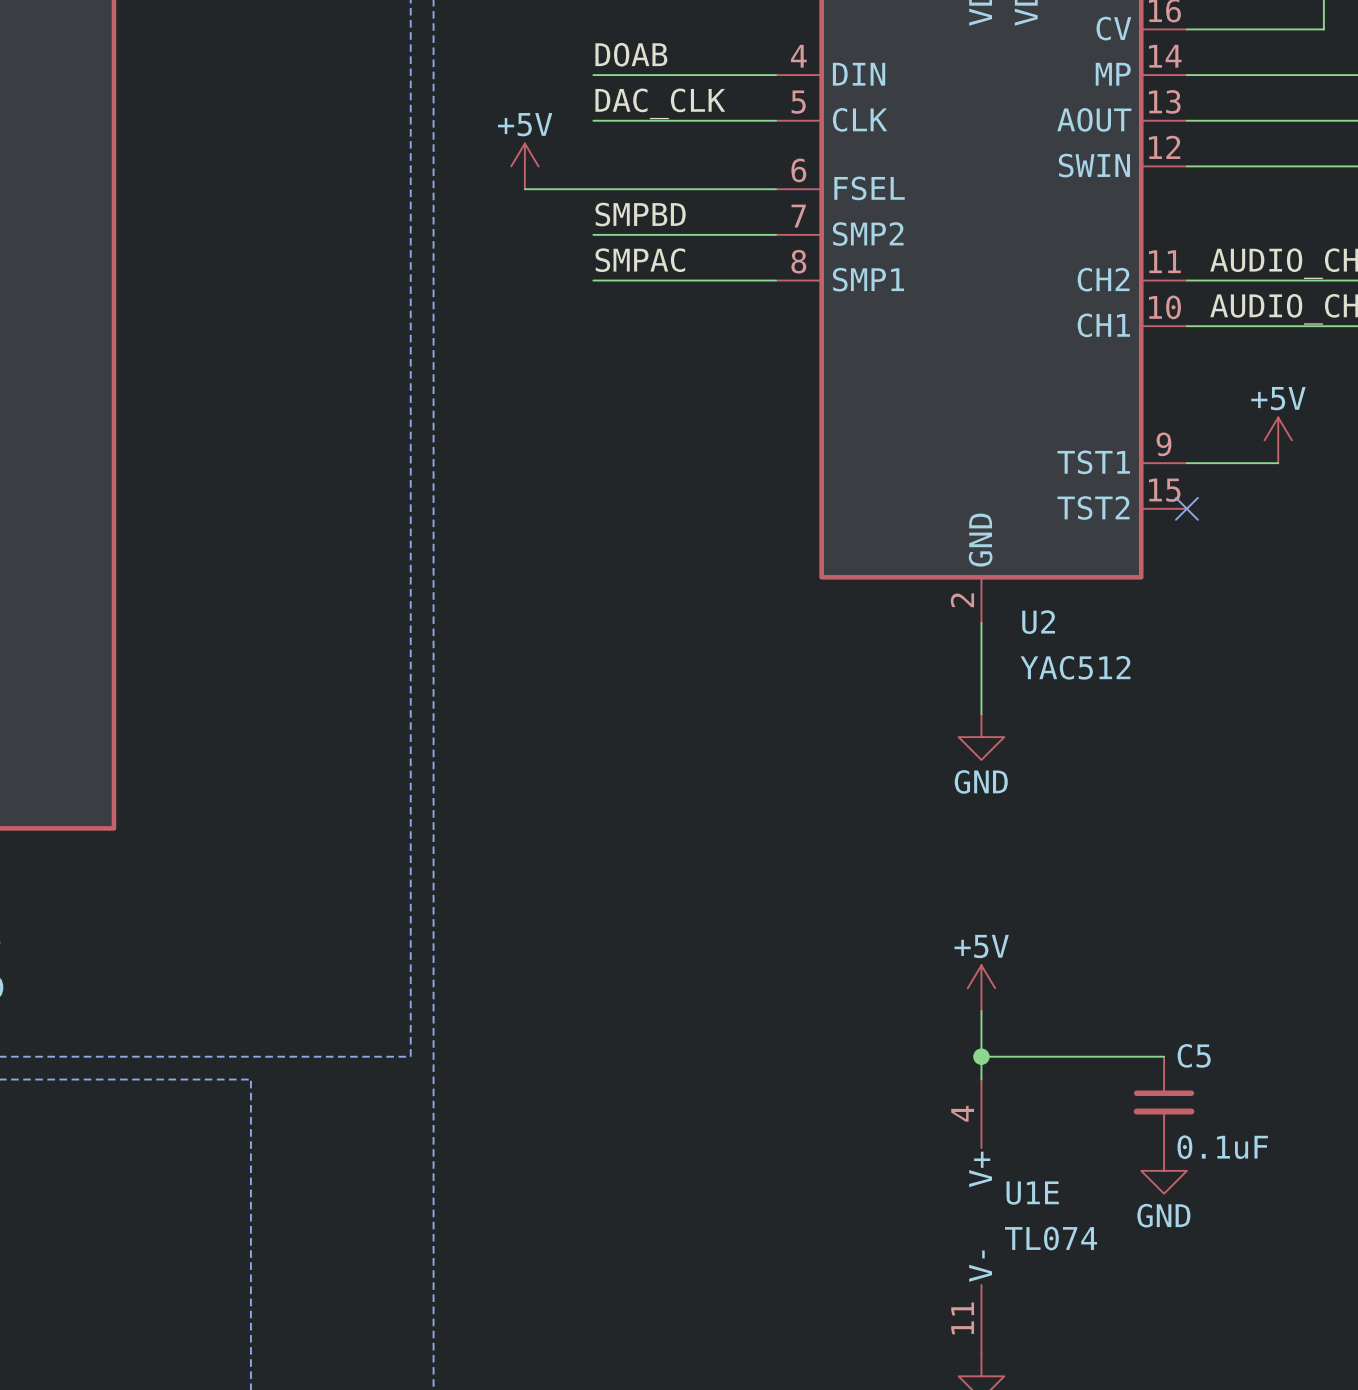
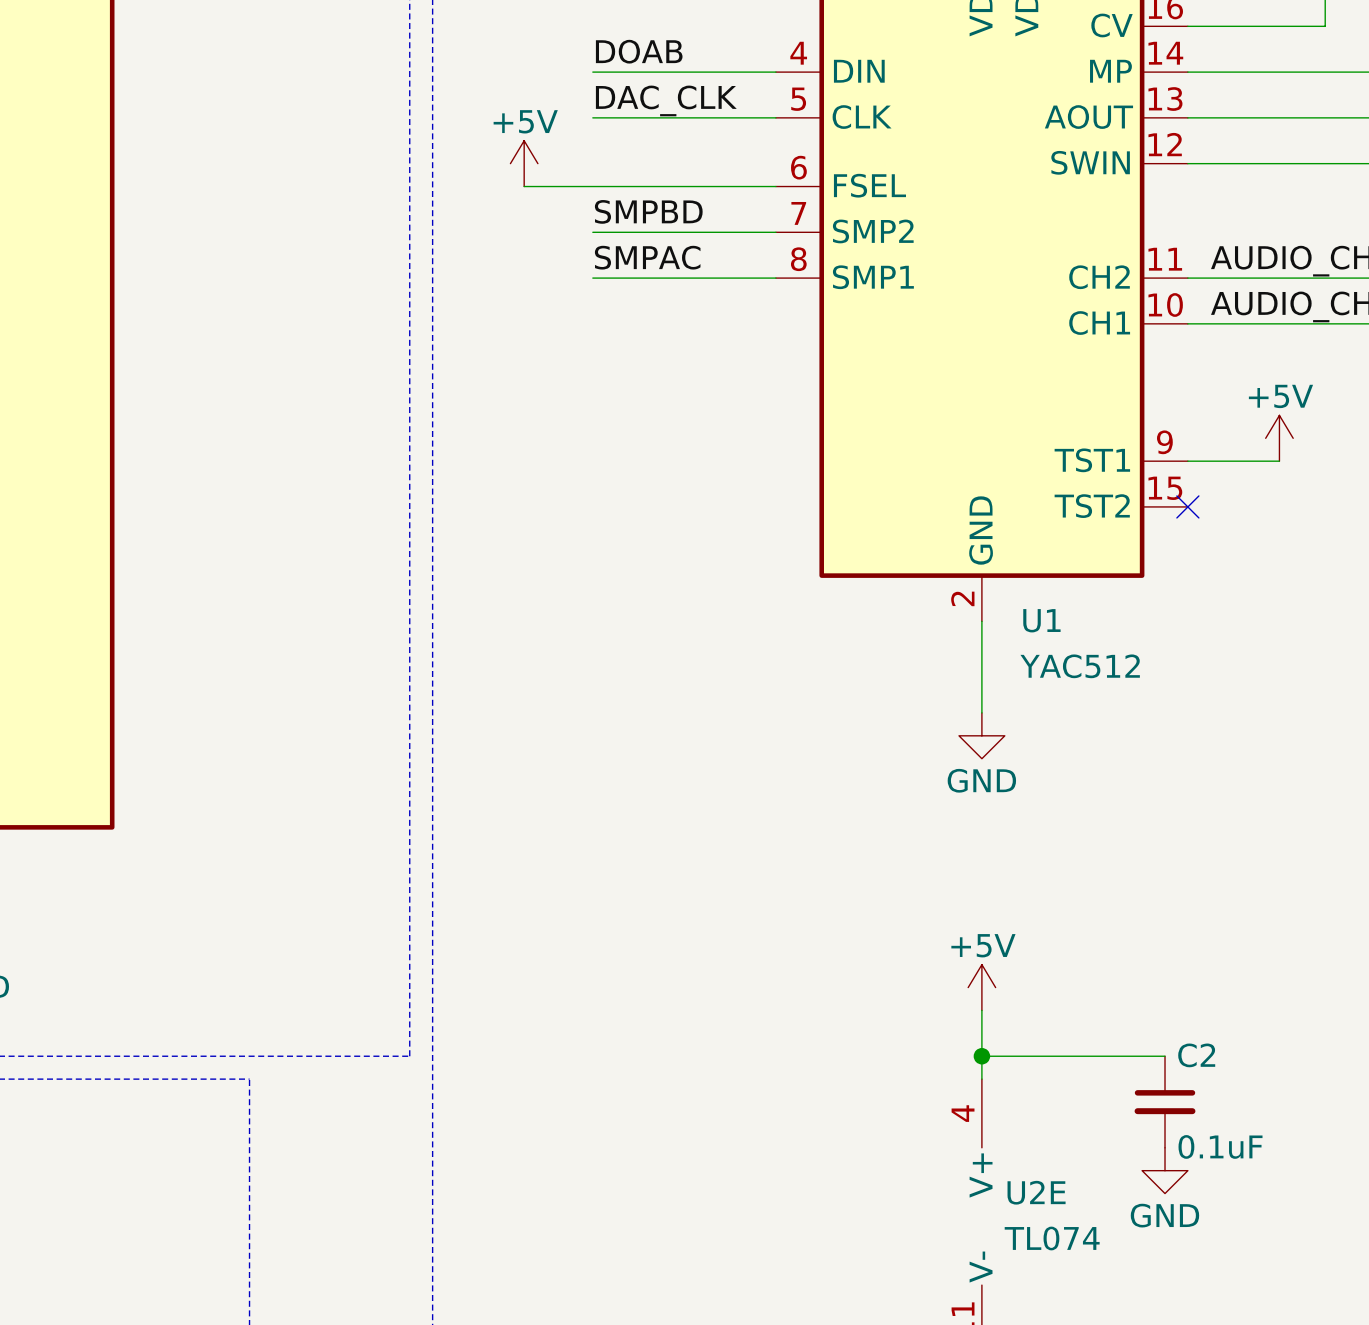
U2 name: U2 (1038, 622) -> U1 (1041, 620)
C5 name: C5 (1194, 1055) -> C2 (1196, 1055)
U1E name: U1E (1032, 1193) -> U2E (1036, 1192)

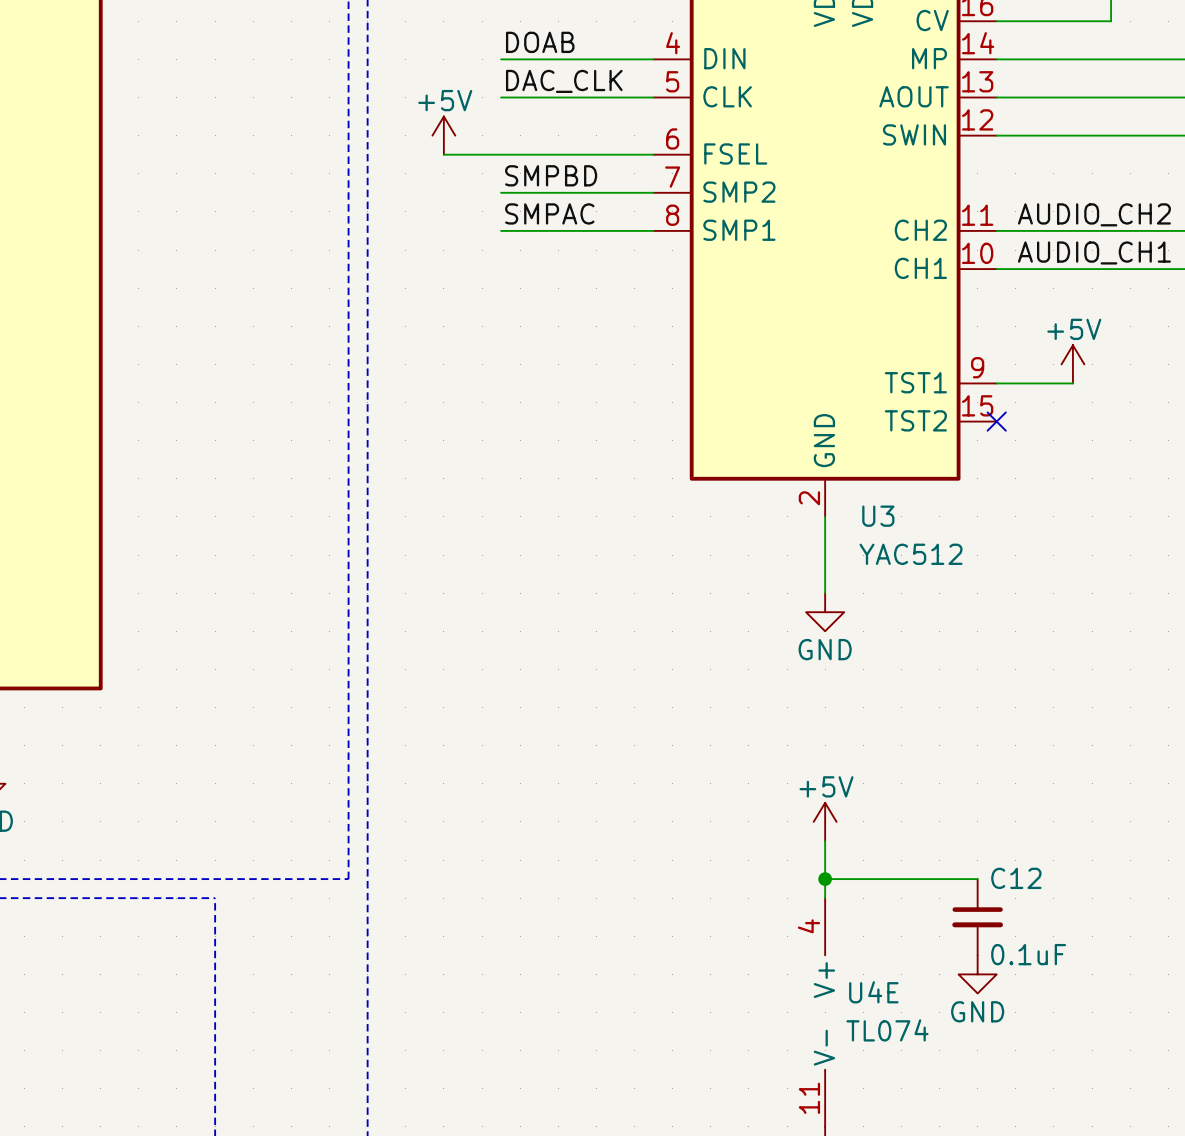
U1 name: U1 (1041, 620) -> U3 (878, 516)
C2 name: C2 (1196, 1055) -> C12 (1016, 878)
U2E name: U2E (1036, 1192) -> U4E (873, 992)

